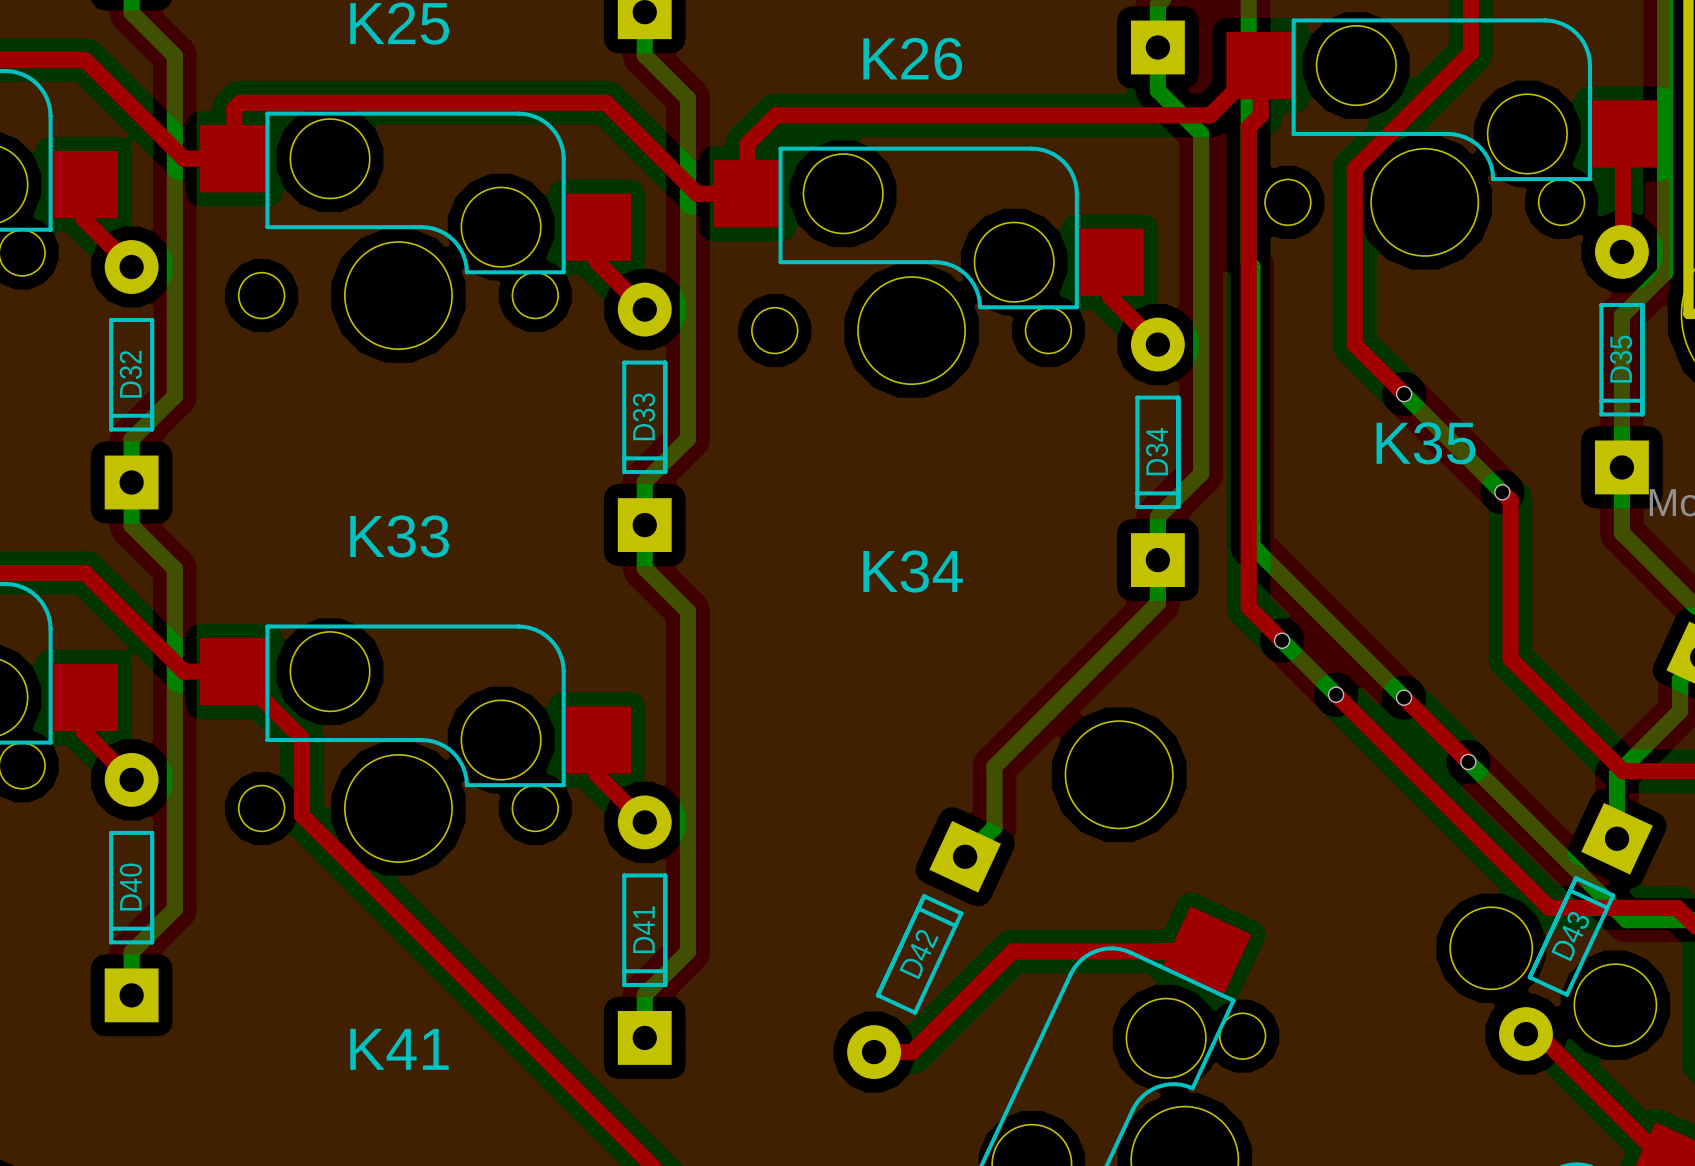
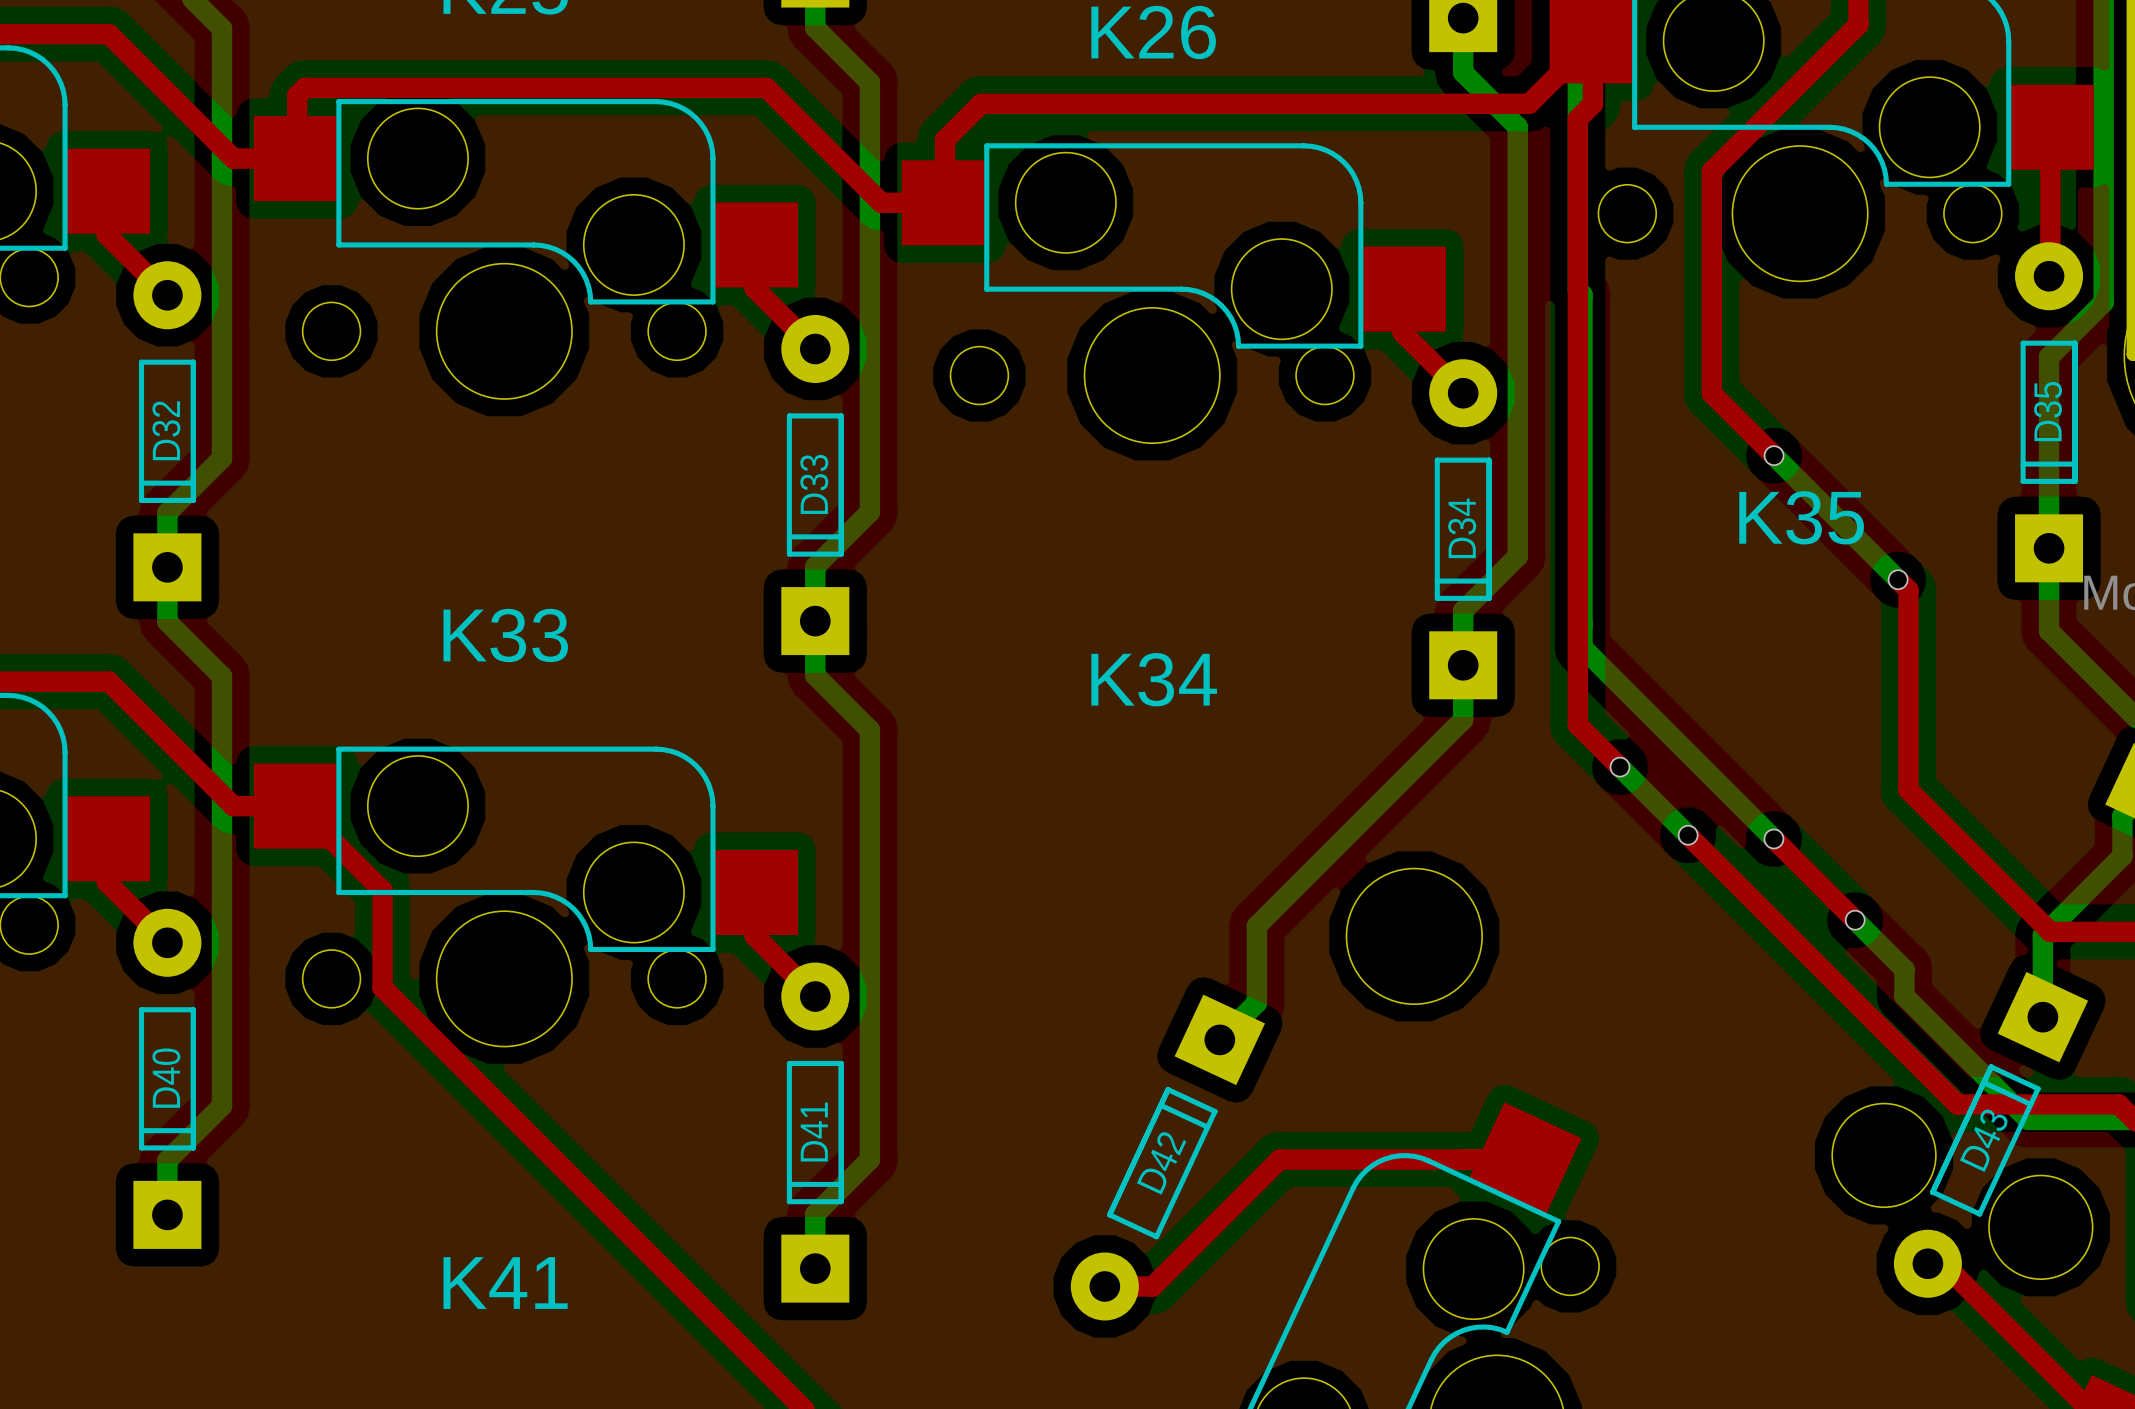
bottom track: (1507, 801) (1626, 920) -> (1904, 969) (1904, 996) (2028, 1119) (2054, 1119)

